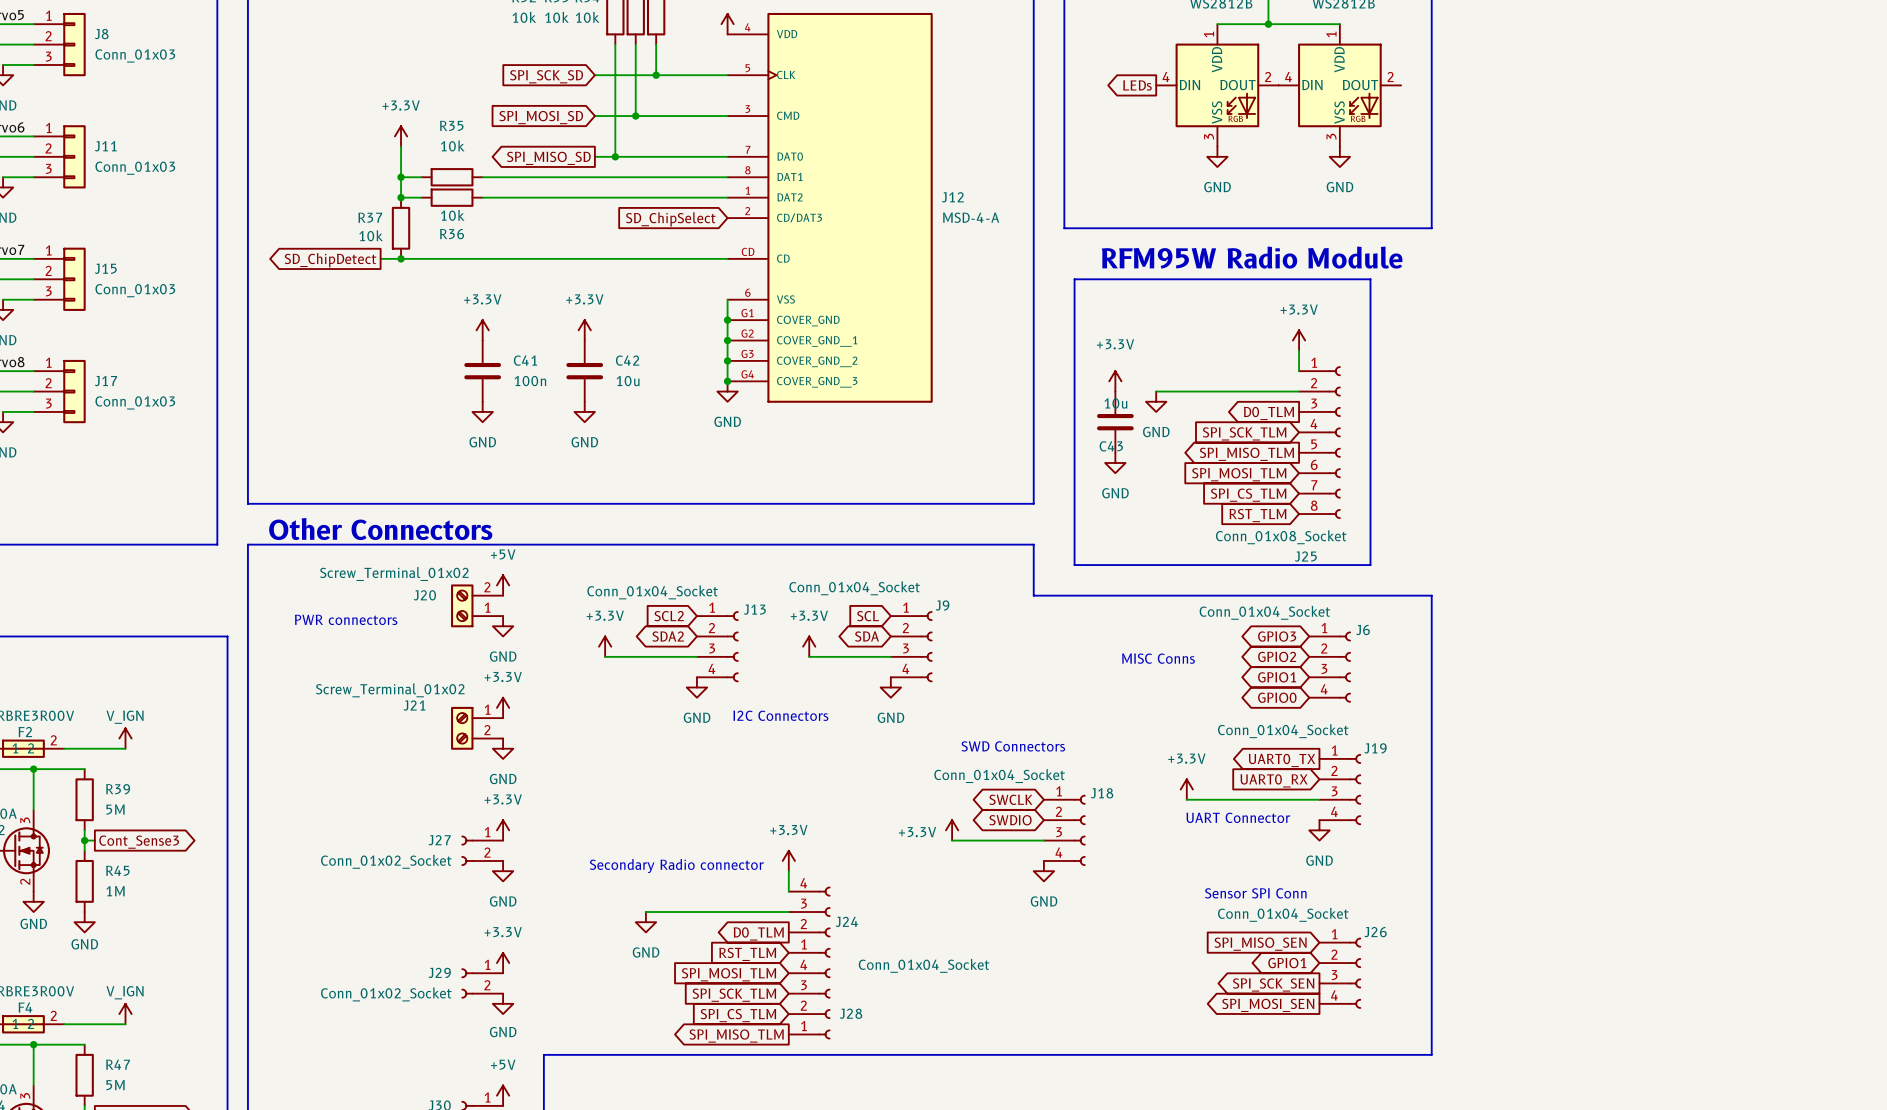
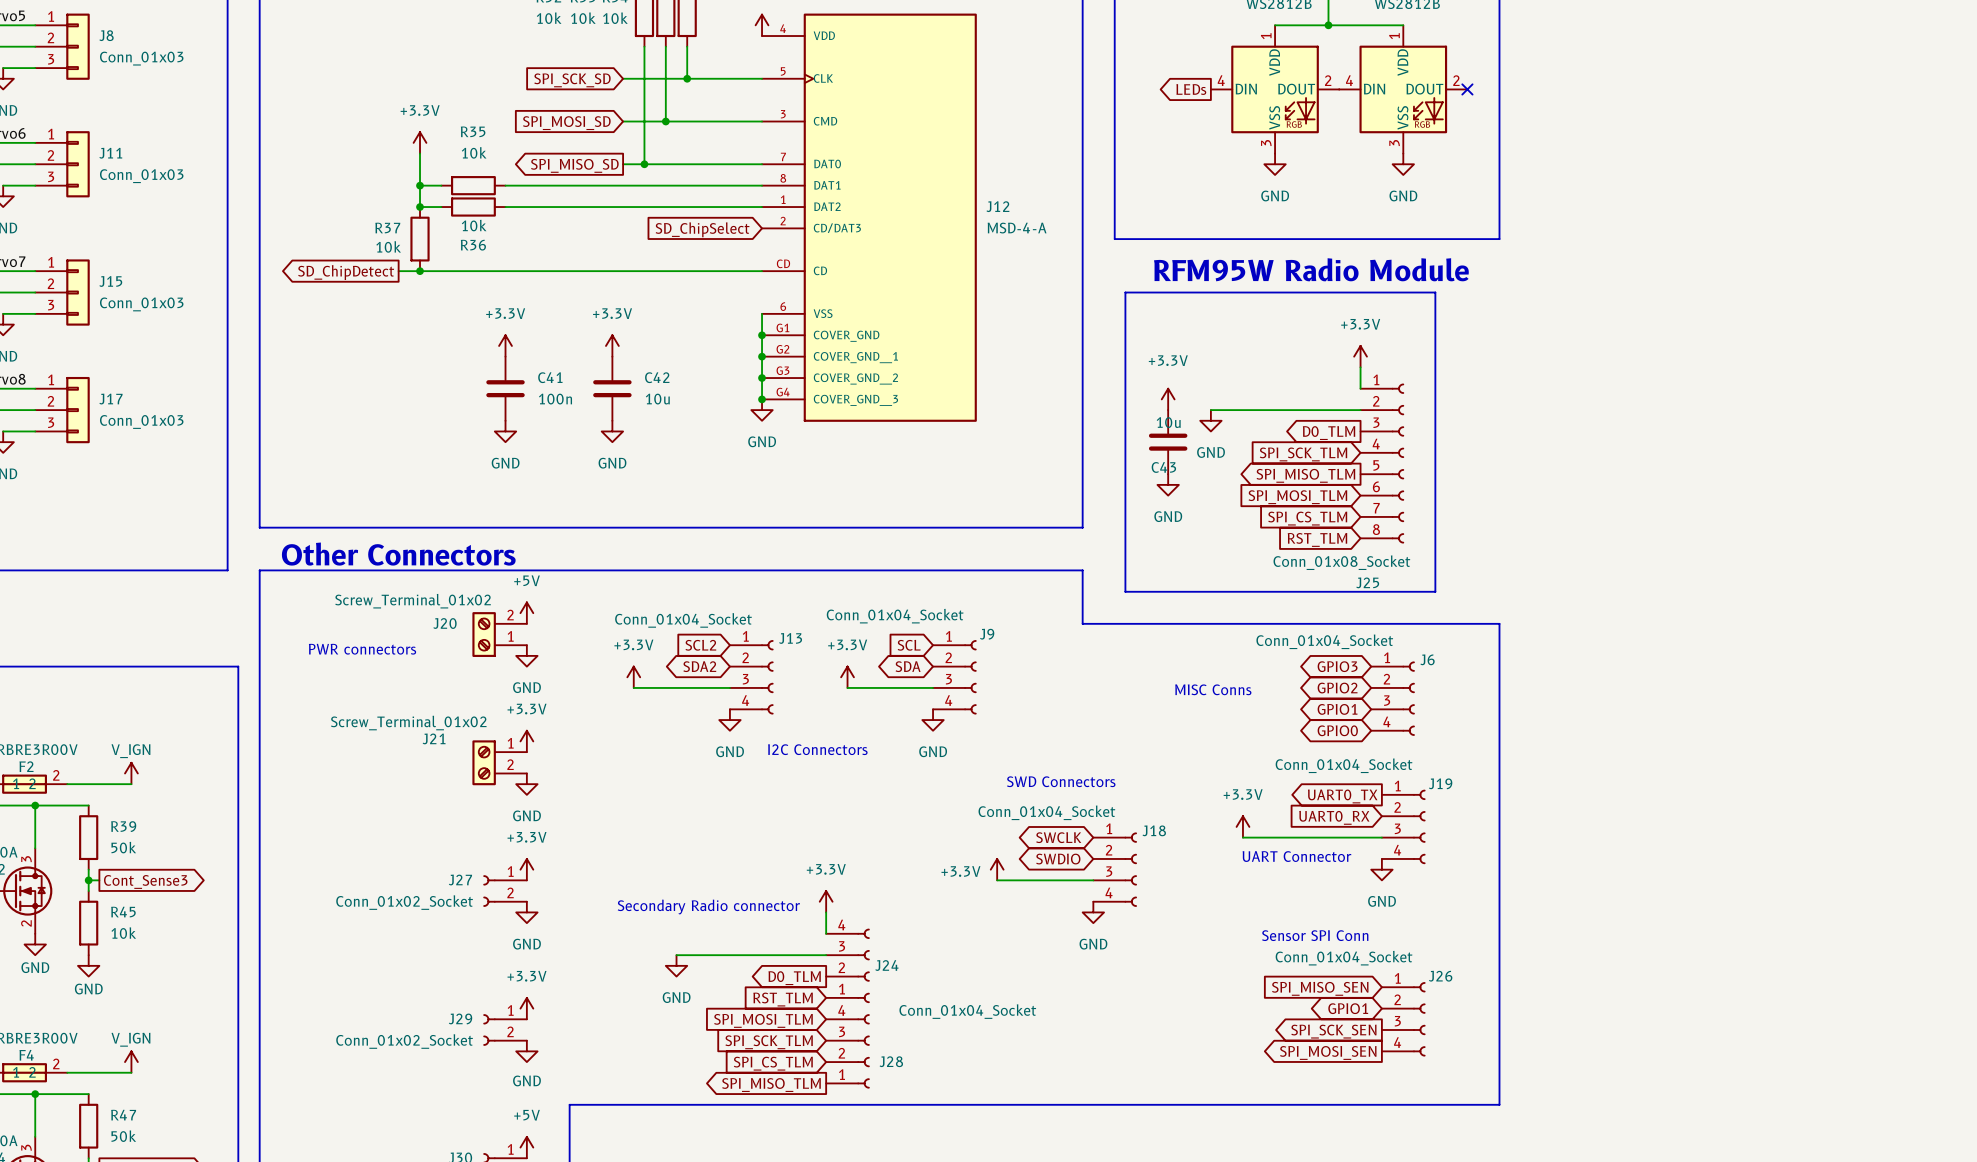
no-connect mark: none -> (1467, 89)
R39 value: 5M (115, 809) -> 50k (123, 847)
R45 value: 1M (115, 891) -> 10k (123, 933)
R47 value: 5M (115, 1085) -> 50k (123, 1136)

